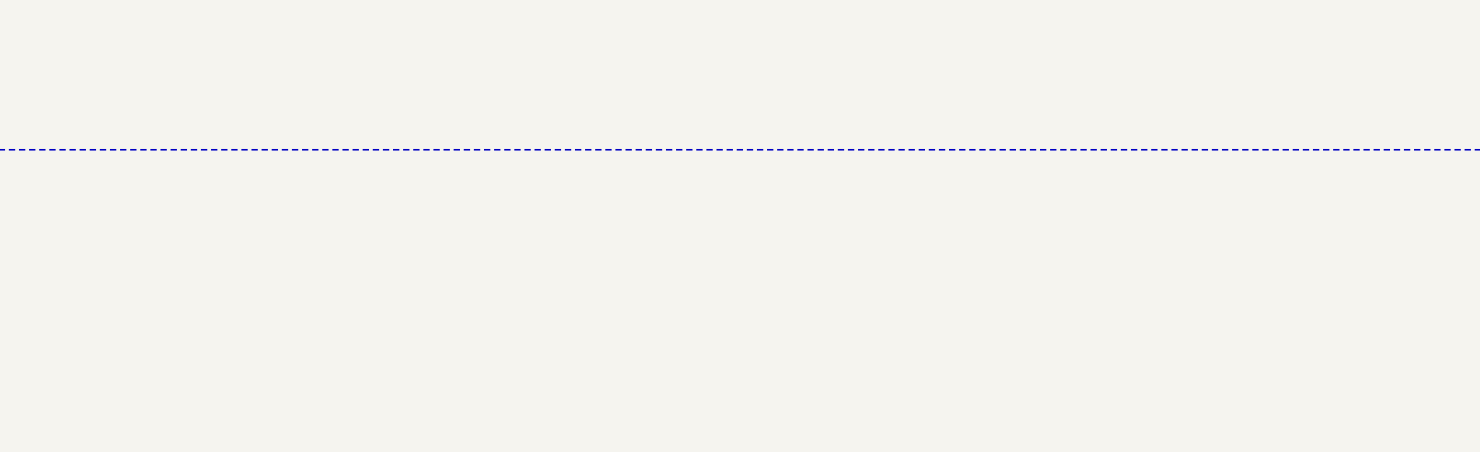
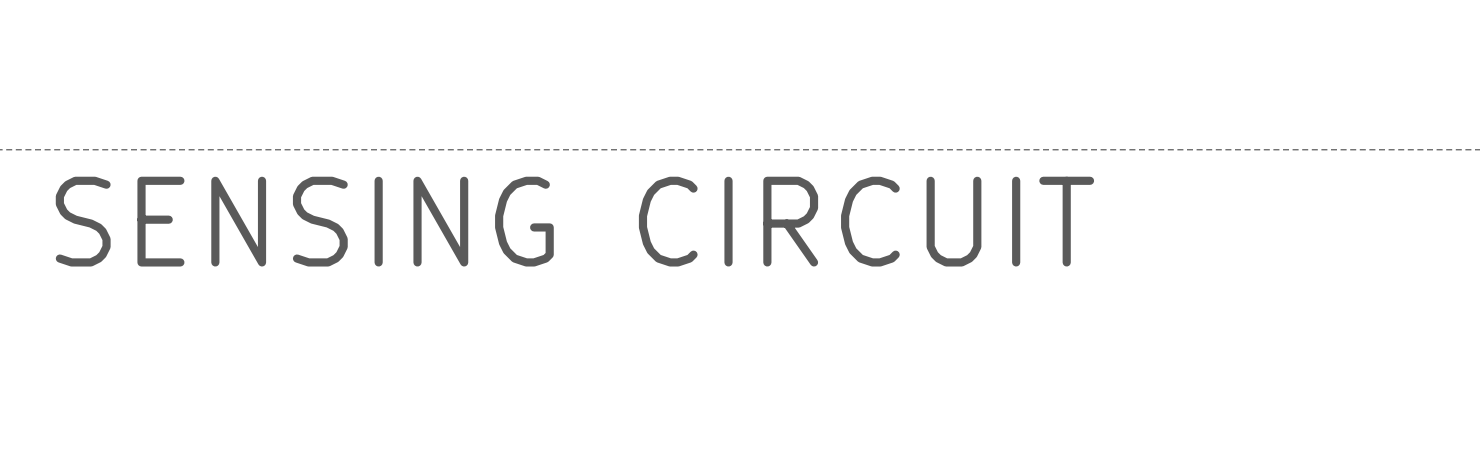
text: none -> SENSING CIRCUIT (574, 221)

